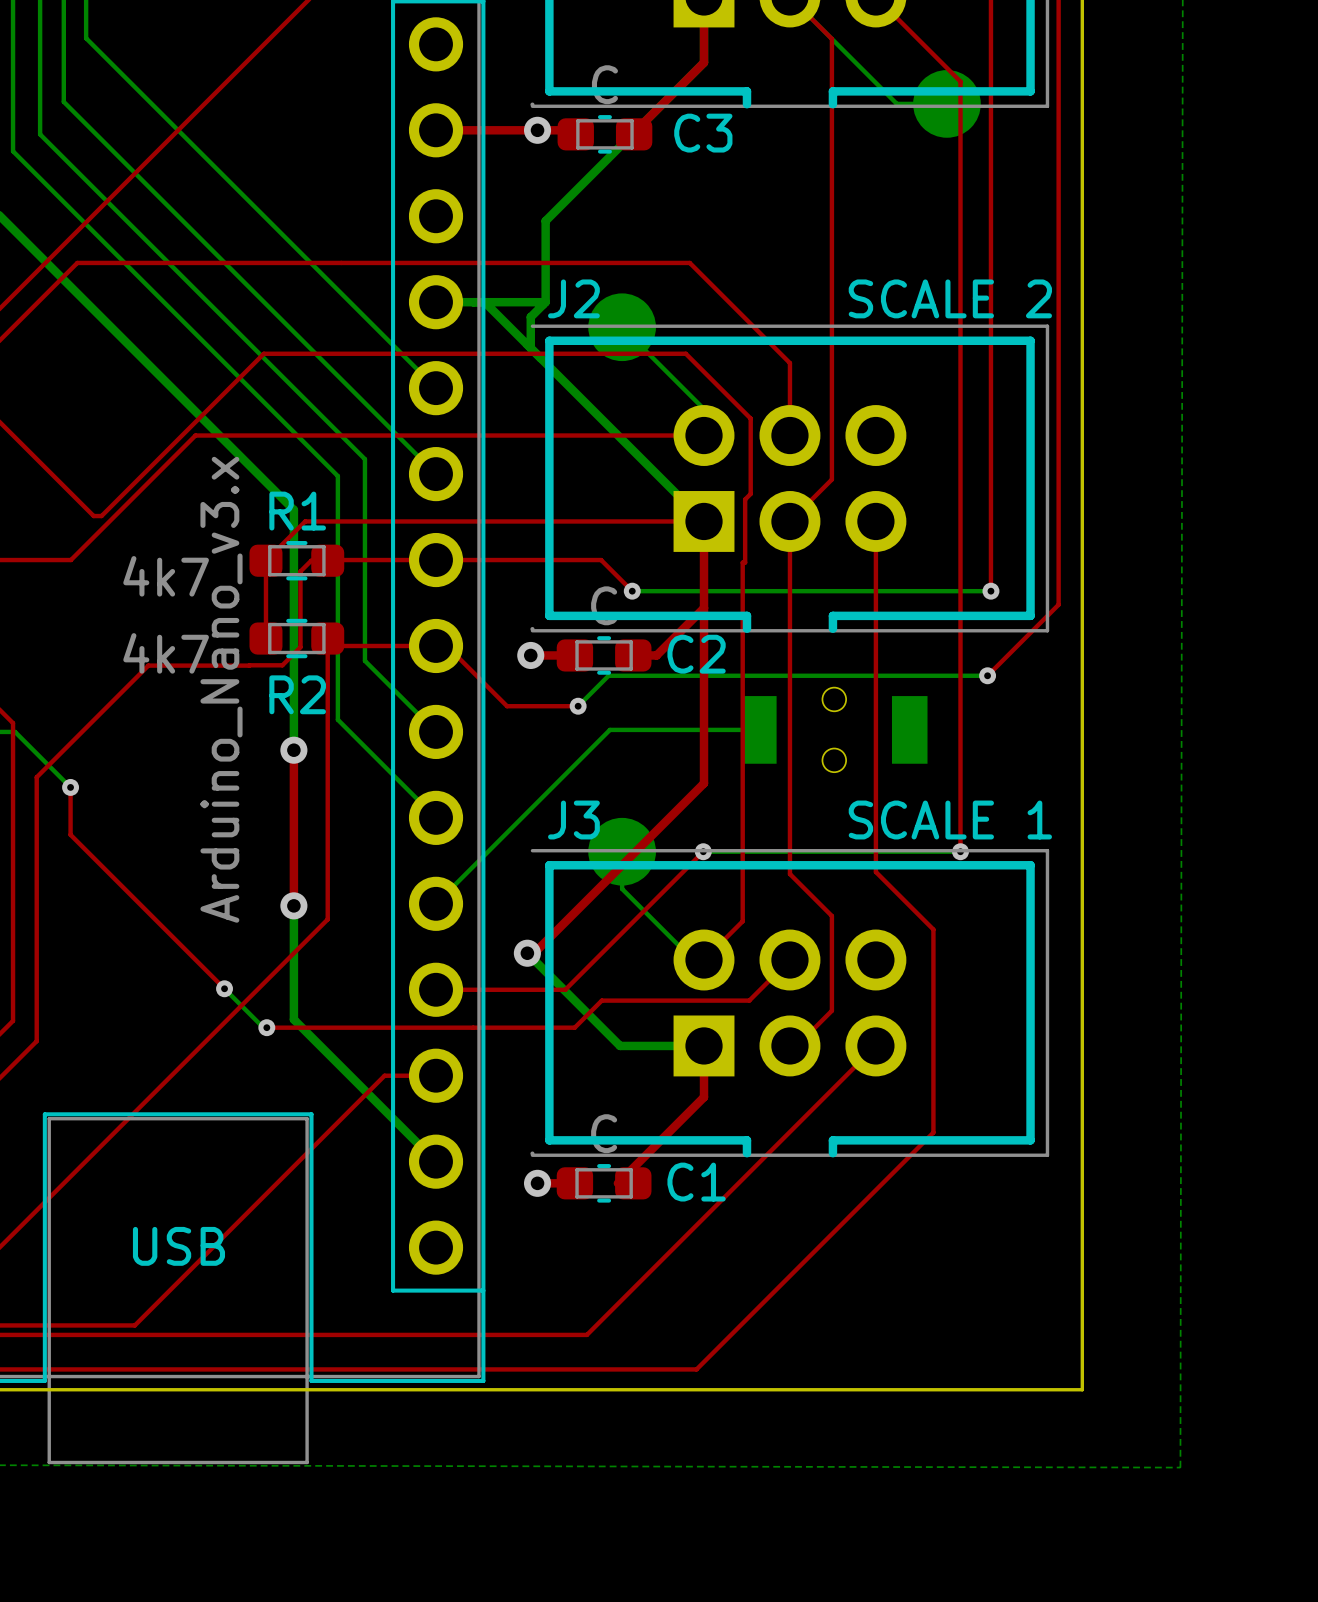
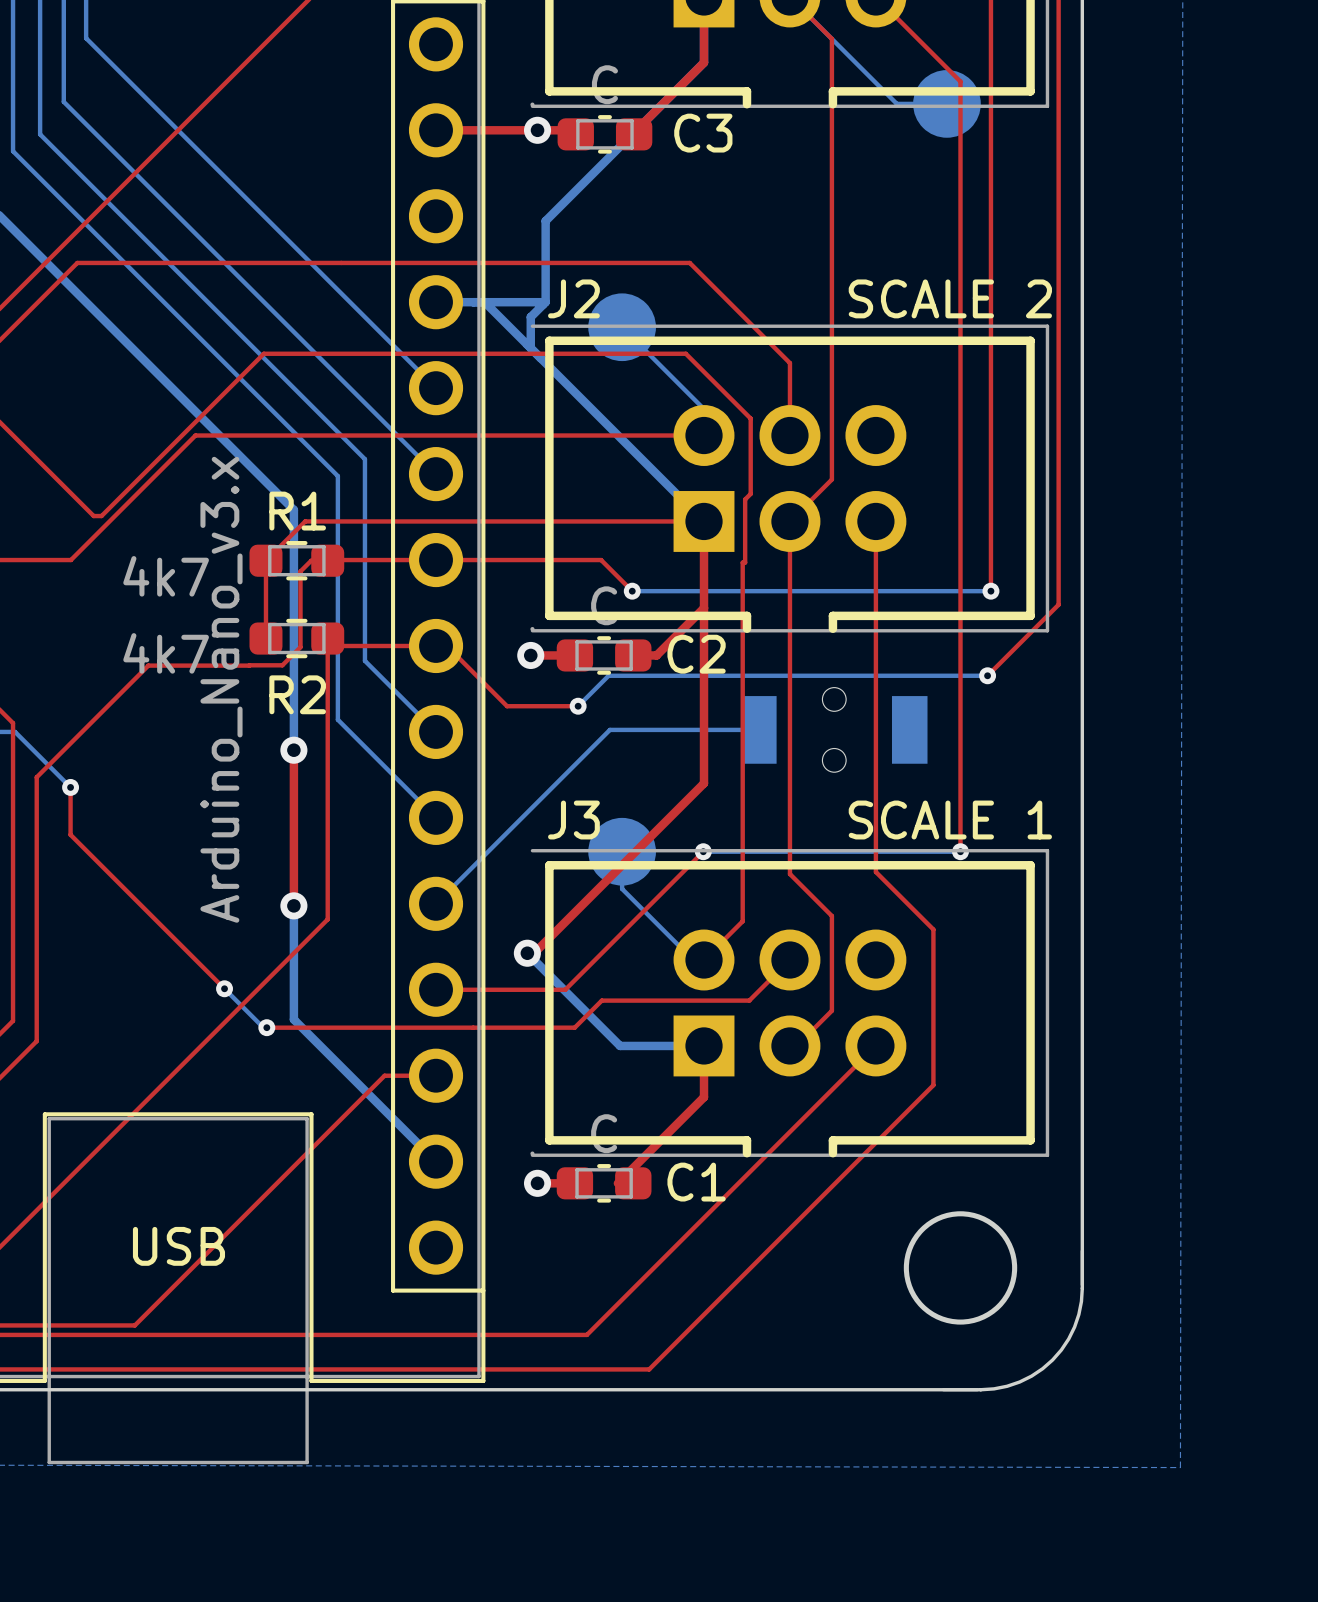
top track: (933, 1085) (933, 1132) (696, 1369) (649, 1369) -> (933, 1085) (649, 1369)
drawing: none -> [903, 1211, 1085, 1392]
board edge: (1082, 1288) (1082, 1389) (980, 1389) -> (1082, 1288) (1081, 1301) (1074, 1327) (1068, 1338) (1052, 1360) (1031, 1376) (1019, 1382) (994, 1388) (980, 1389)

